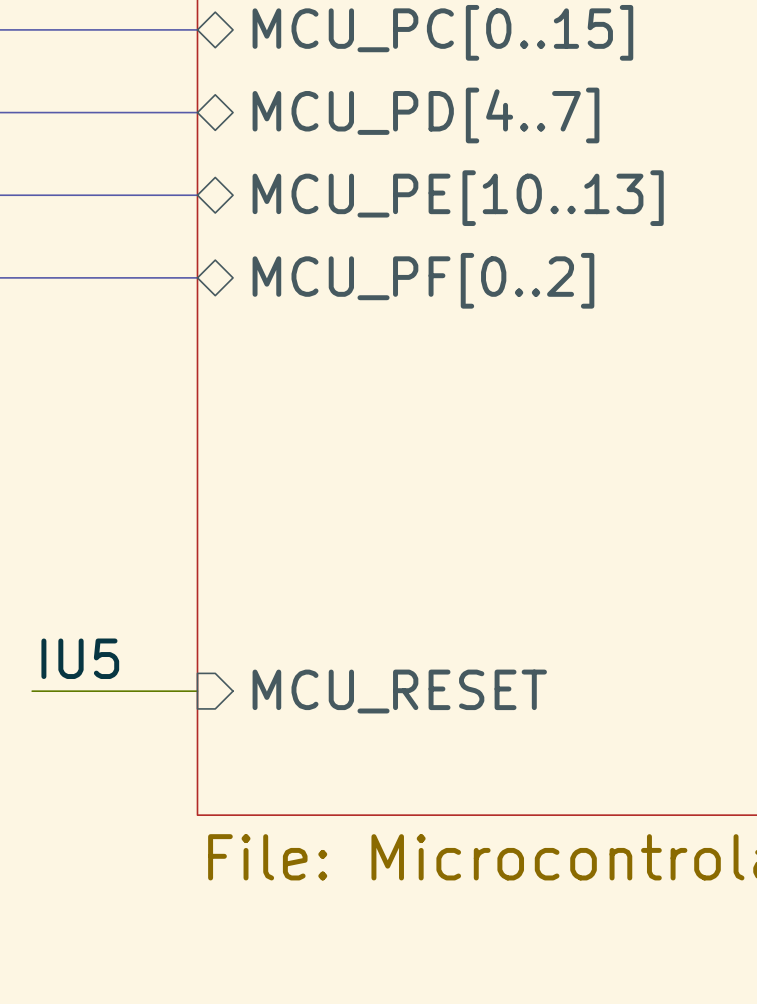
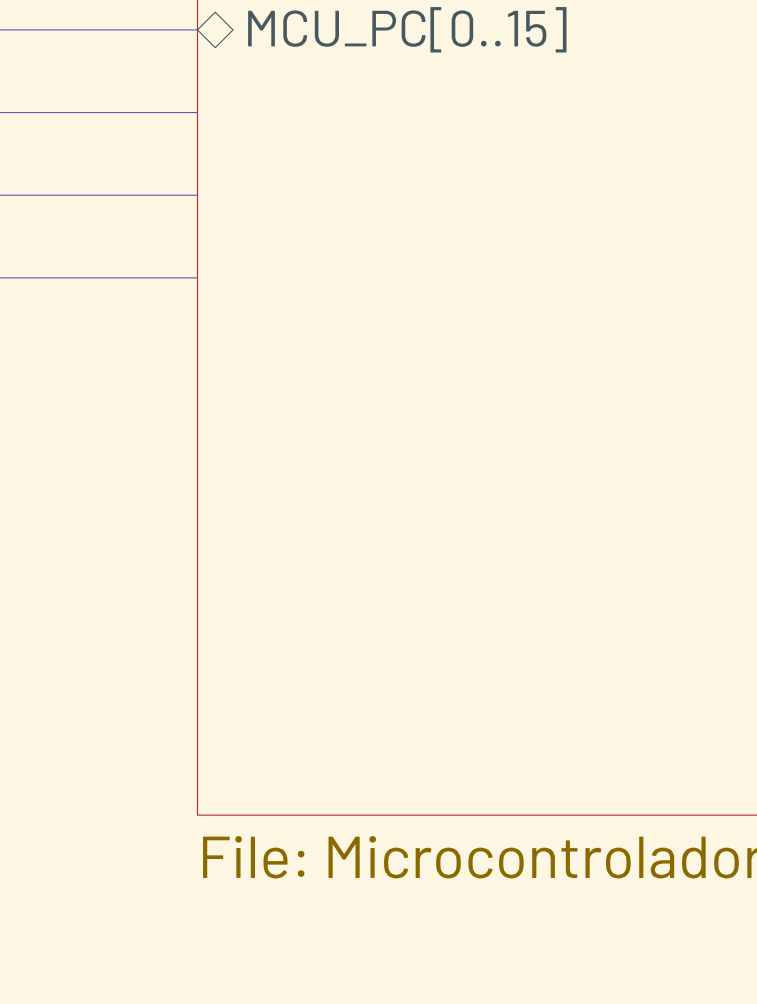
sheet pin: MCU_PD[4..7] (425, 115) -> none
sheet pin: MCU_PE[10..13] (458, 198) -> none
sheet pin: MCU_PF[0..2] (423, 280) -> none
label: IU5 (80, 658) -> none
wire: (32, 691) (197, 691) -> none
sheet pin: MCU_RESET (399, 691) -> none

